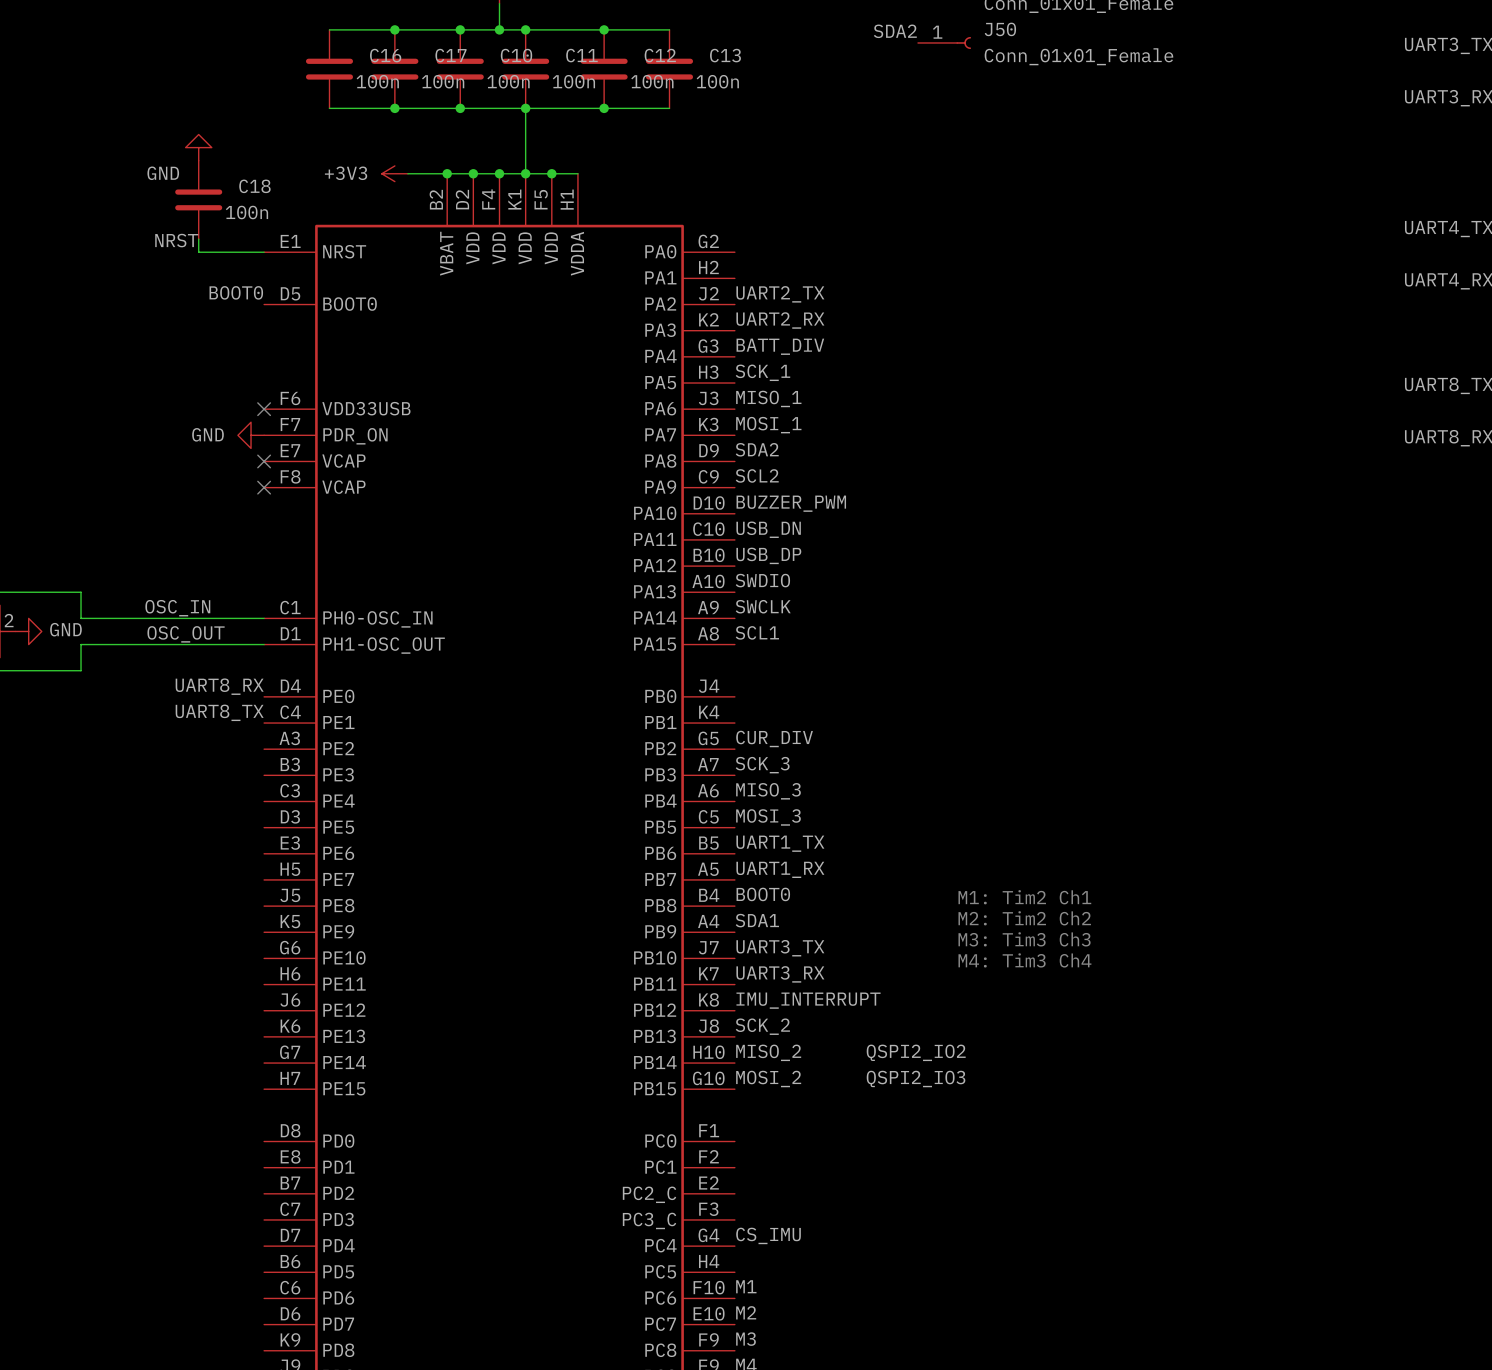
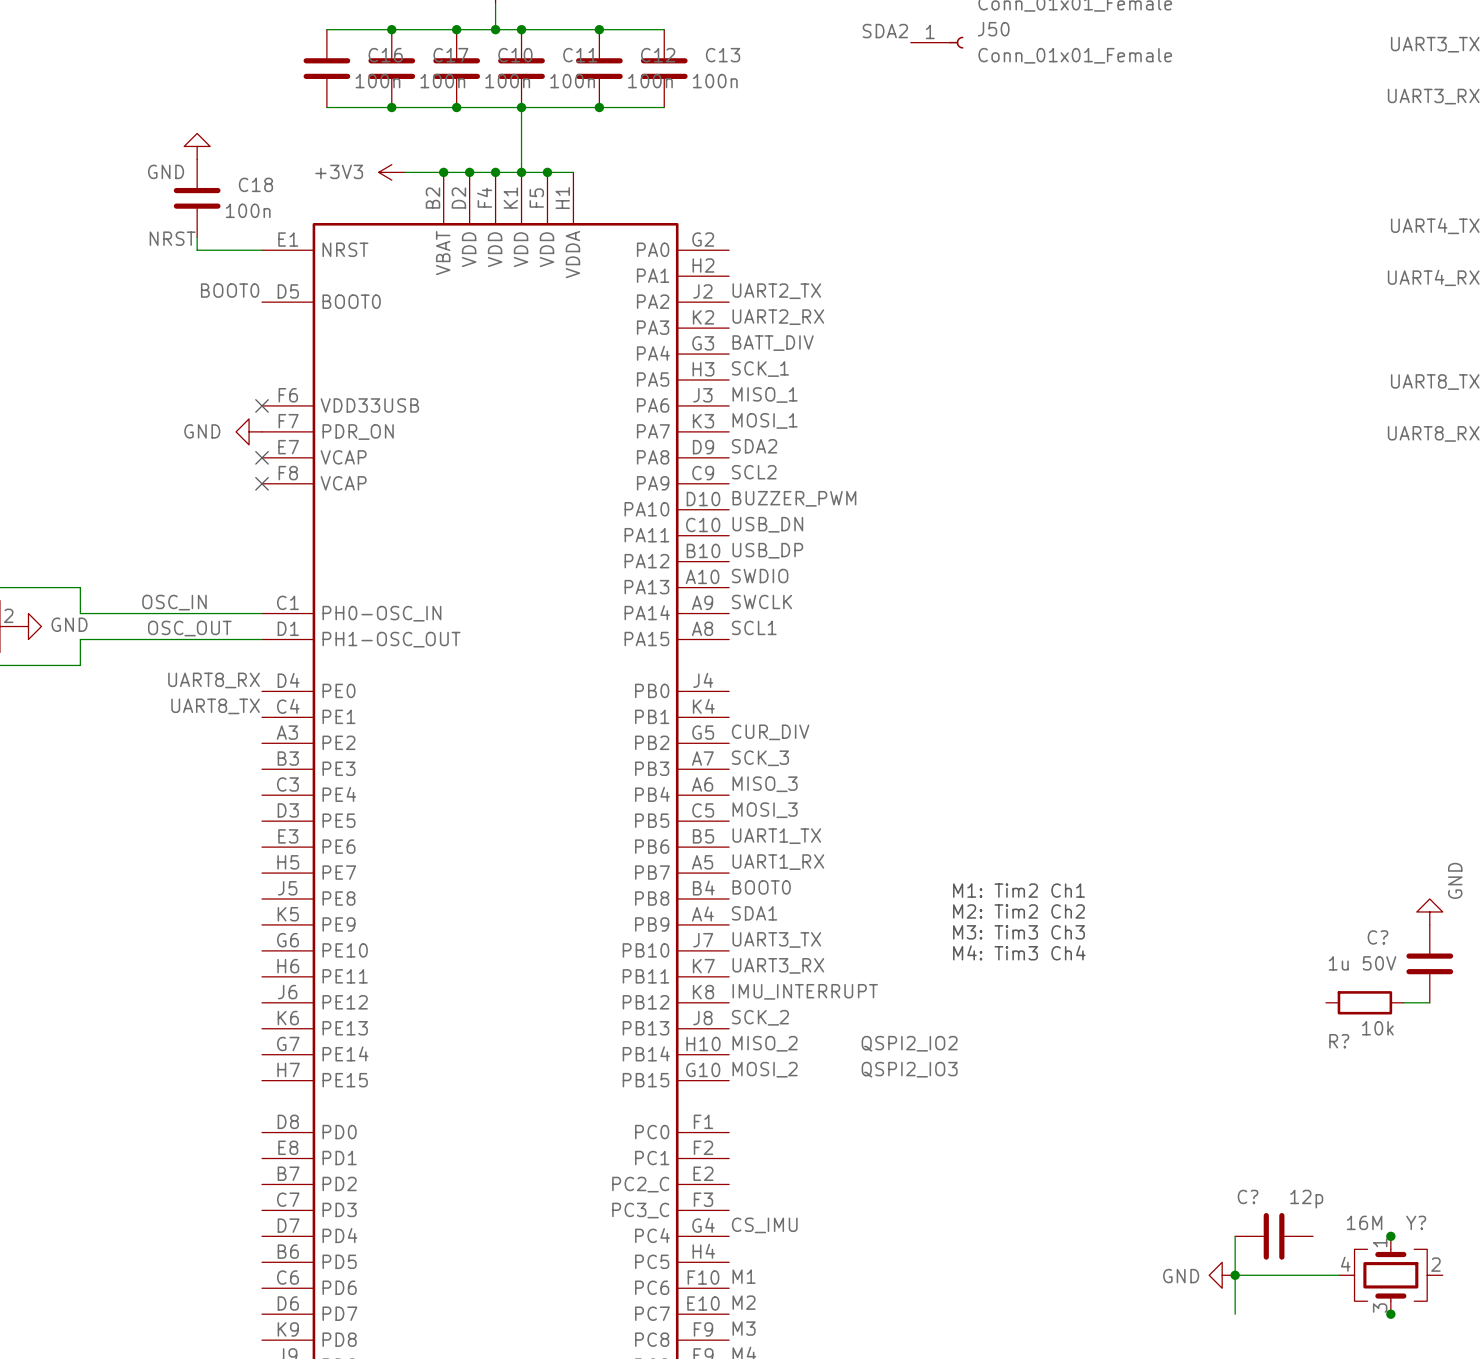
power symbol: none -> GND (1429, 911)
C?: none -> 1u 50V (1429, 963)
R?: none -> 10k (1364, 1002)
wire: none -> (1403, 1002) (1429, 1002)
wire: none -> (1235, 1236) (1235, 1314)
C?: none -> 12p (1274, 1236)
junction: none -> (1390, 1236)
power symbol: none -> GND (1222, 1275)
wire: none -> (1235, 1275) (1338, 1275)
junction: none -> (1235, 1275)
Y?: none -> 16M (1390, 1275)
junction: none -> (1390, 1314)

